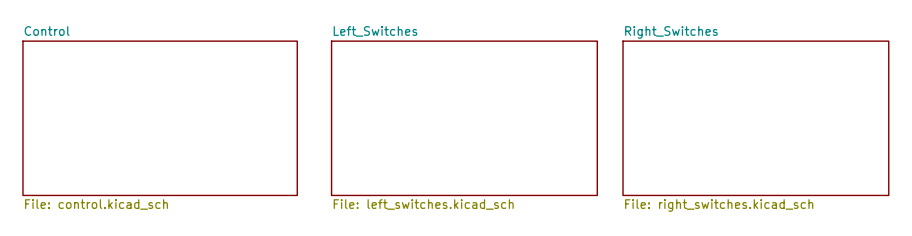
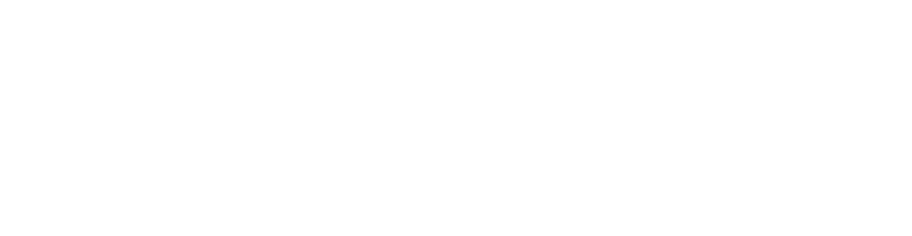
sheet Control: File: control.kicad_sch (160, 118) -> none
sheet Left_Switches: File: left_switches.kicad_sch (464, 118) -> none
sheet Right_Switches: File: right_switches.kicad_sch (755, 118) -> none

